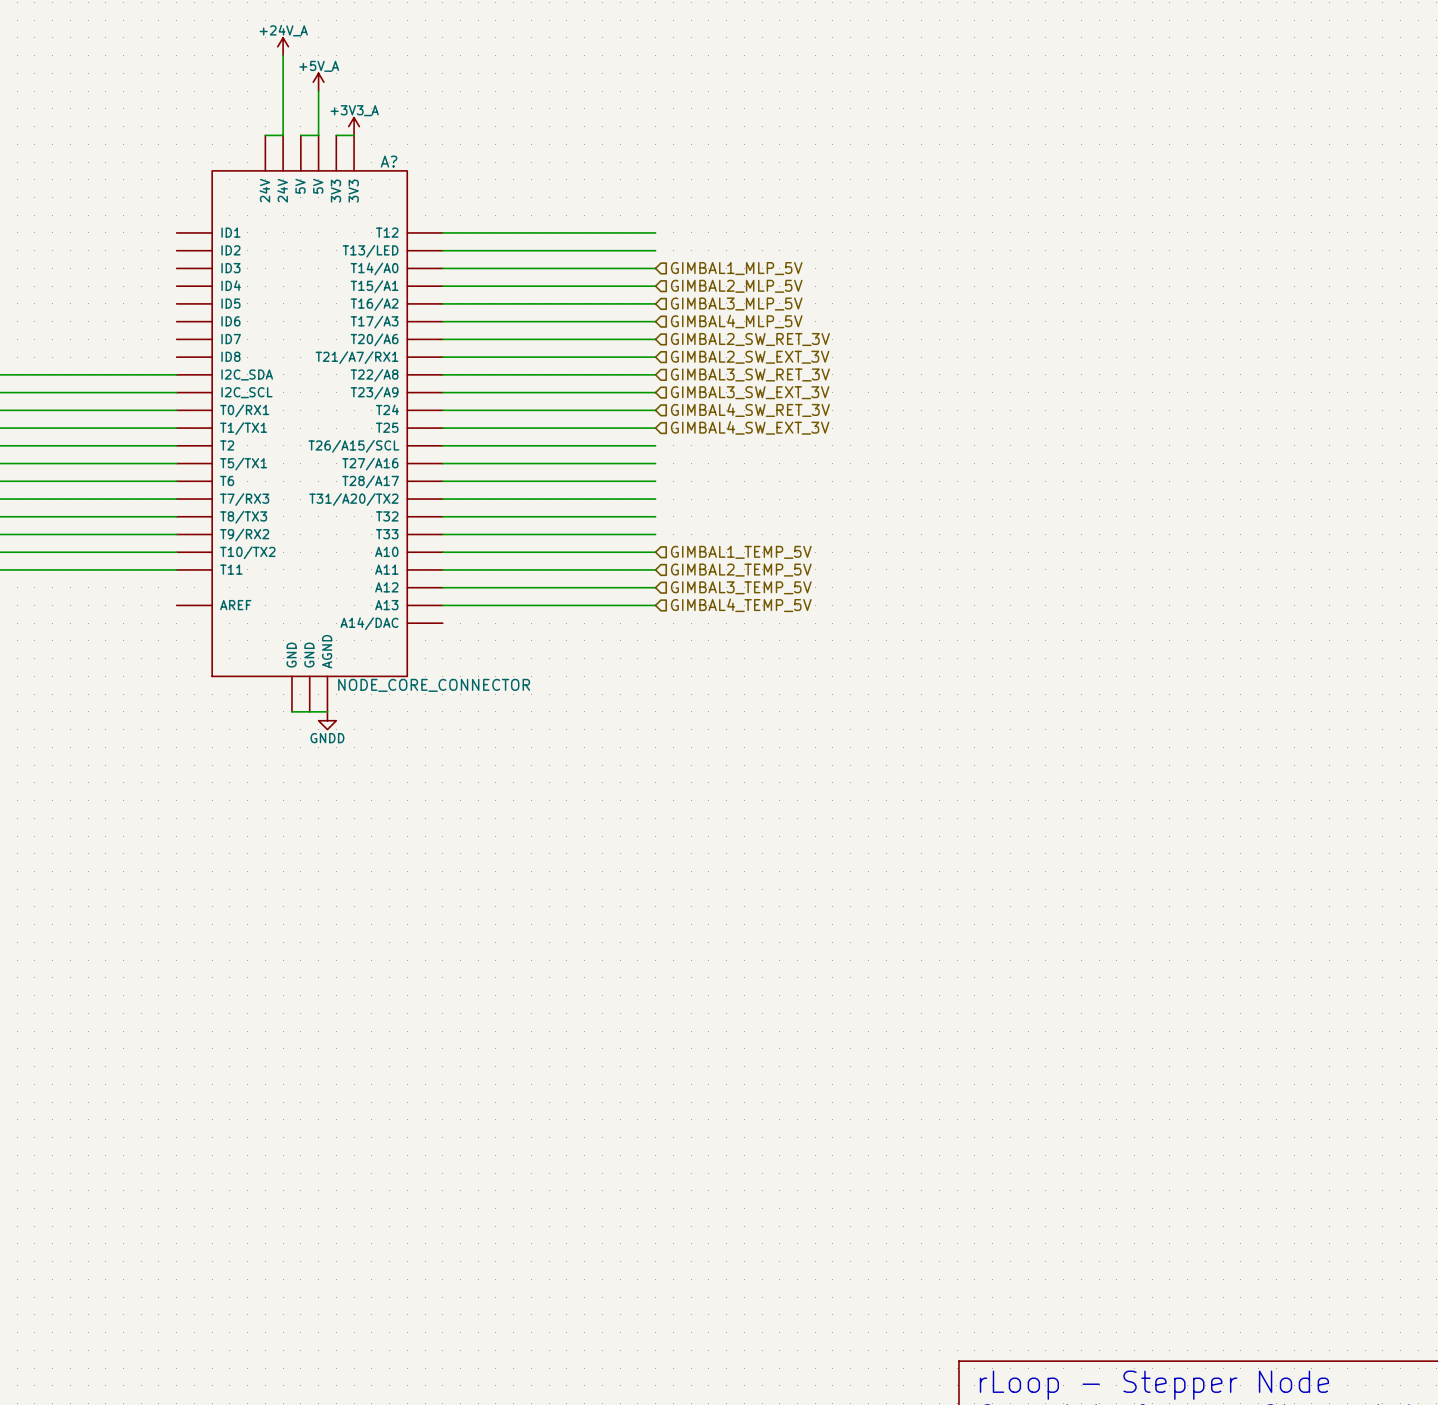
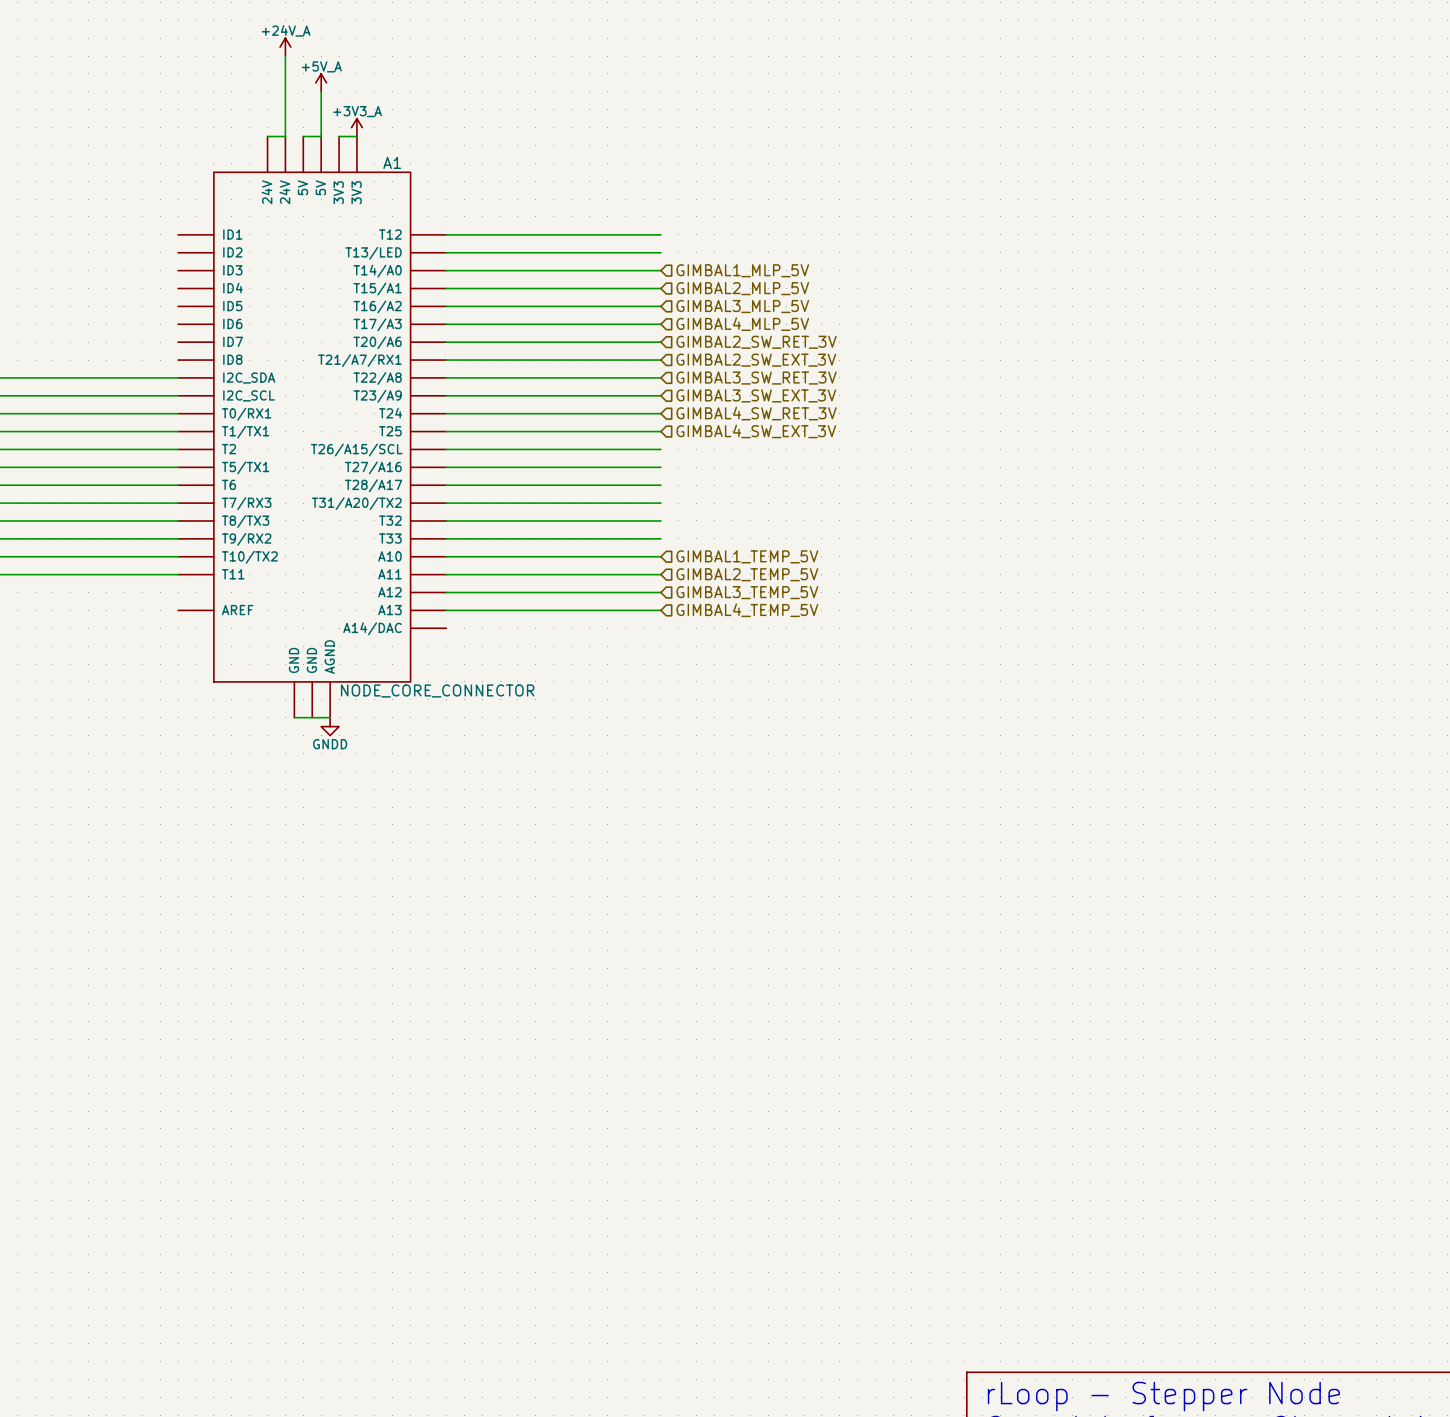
A? name: A? (389, 161) -> A1 (392, 162)

